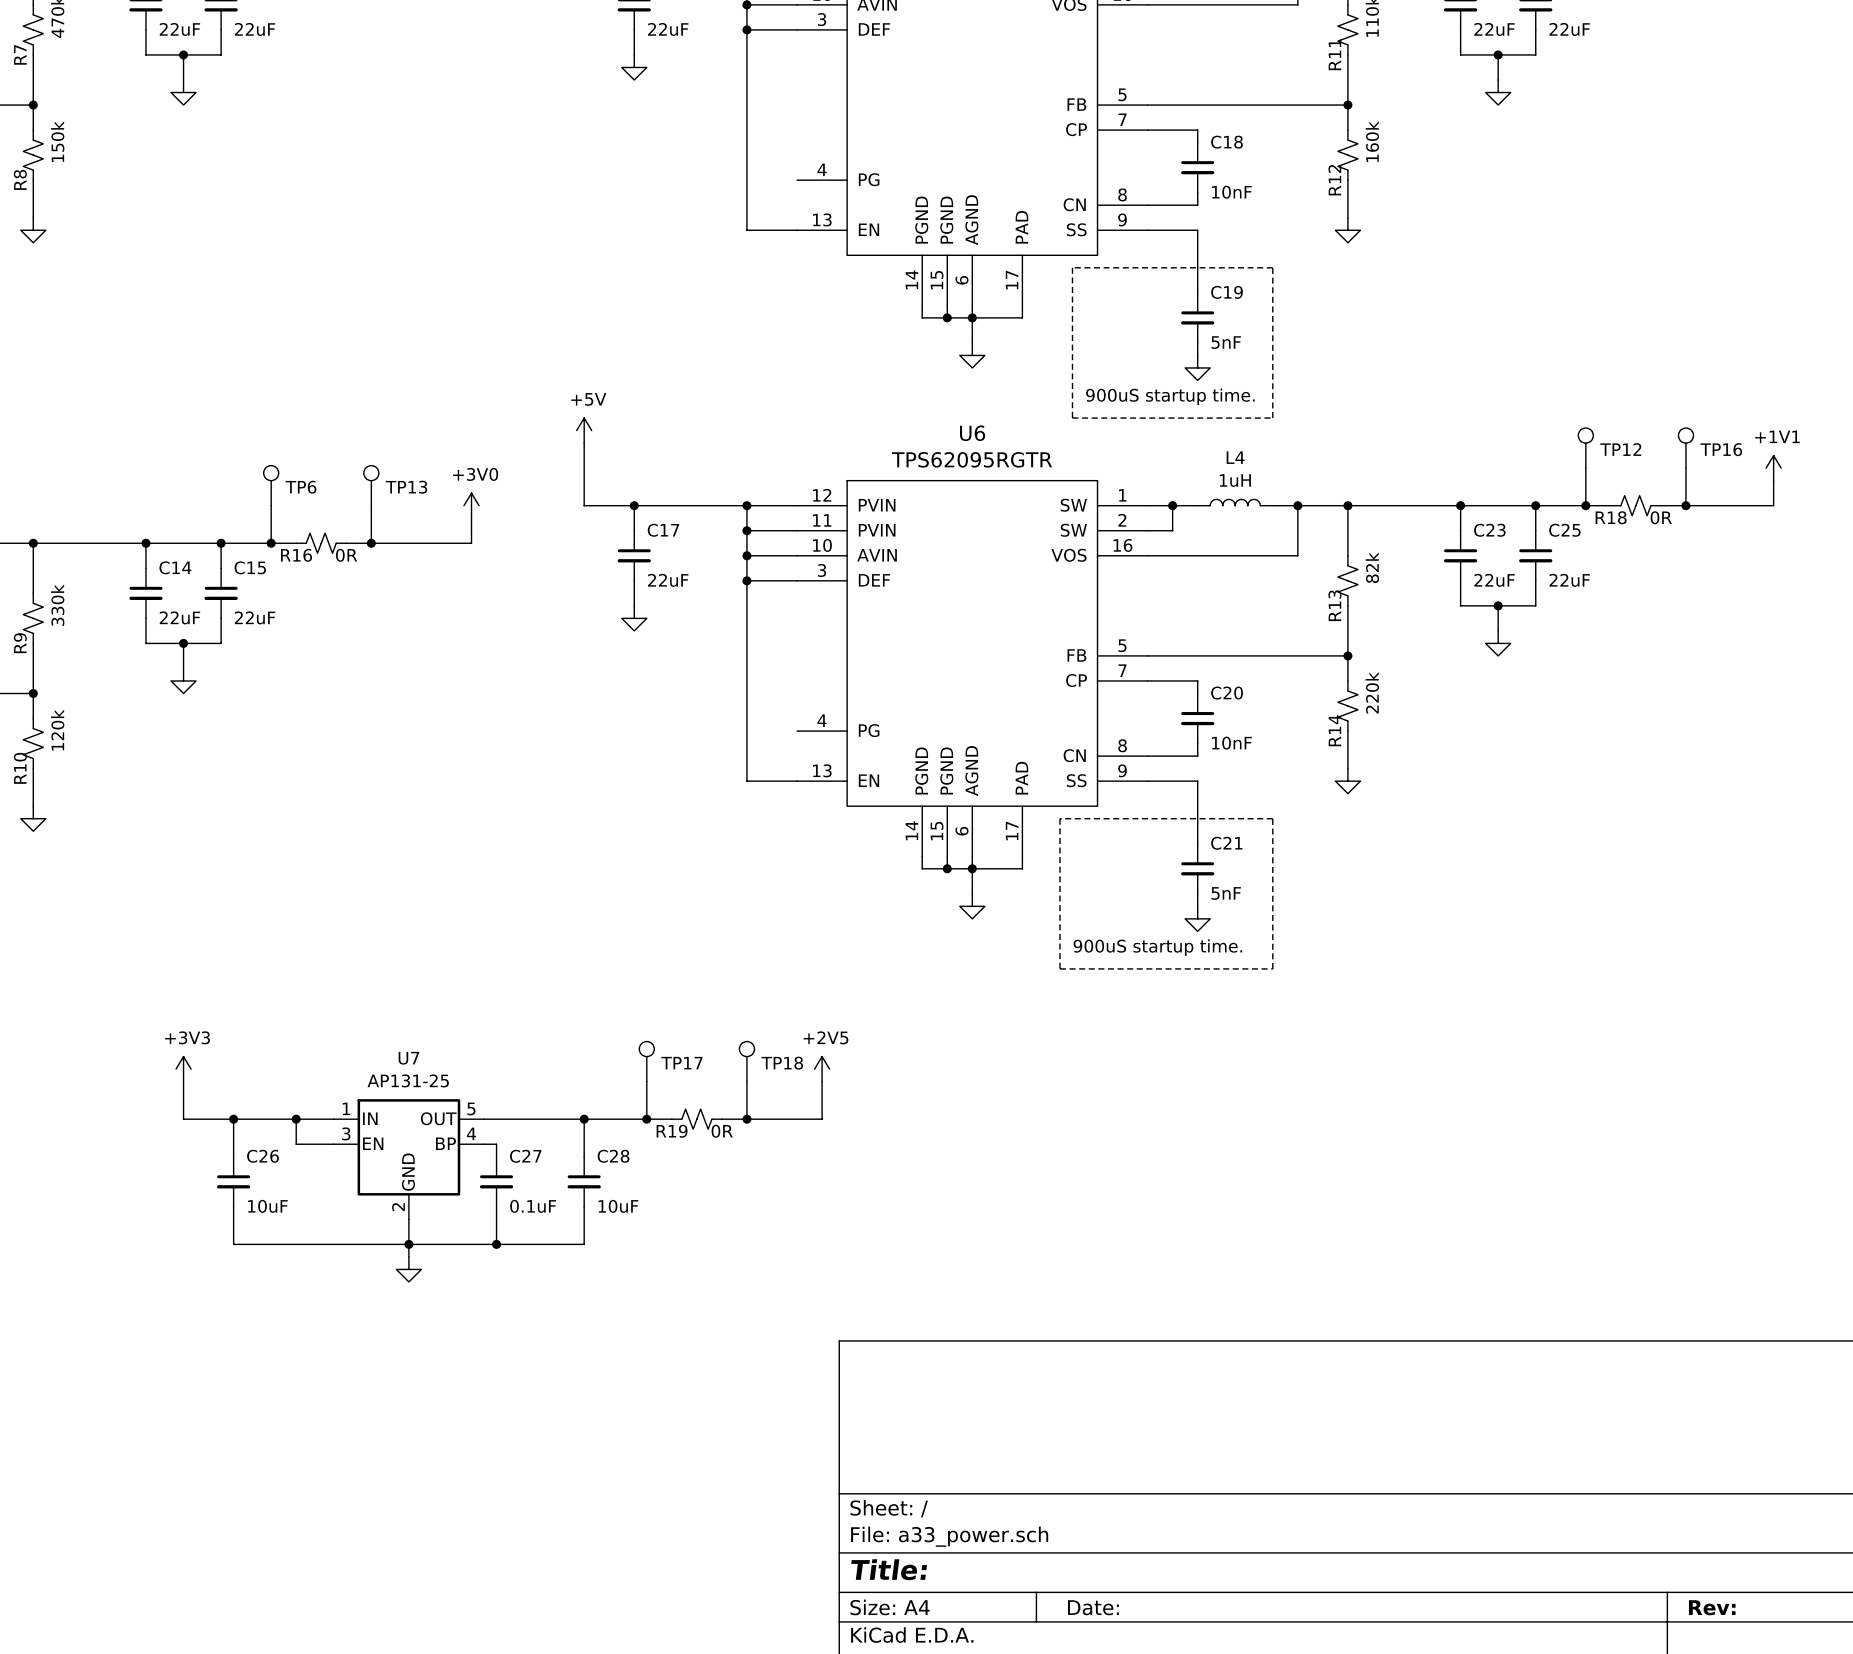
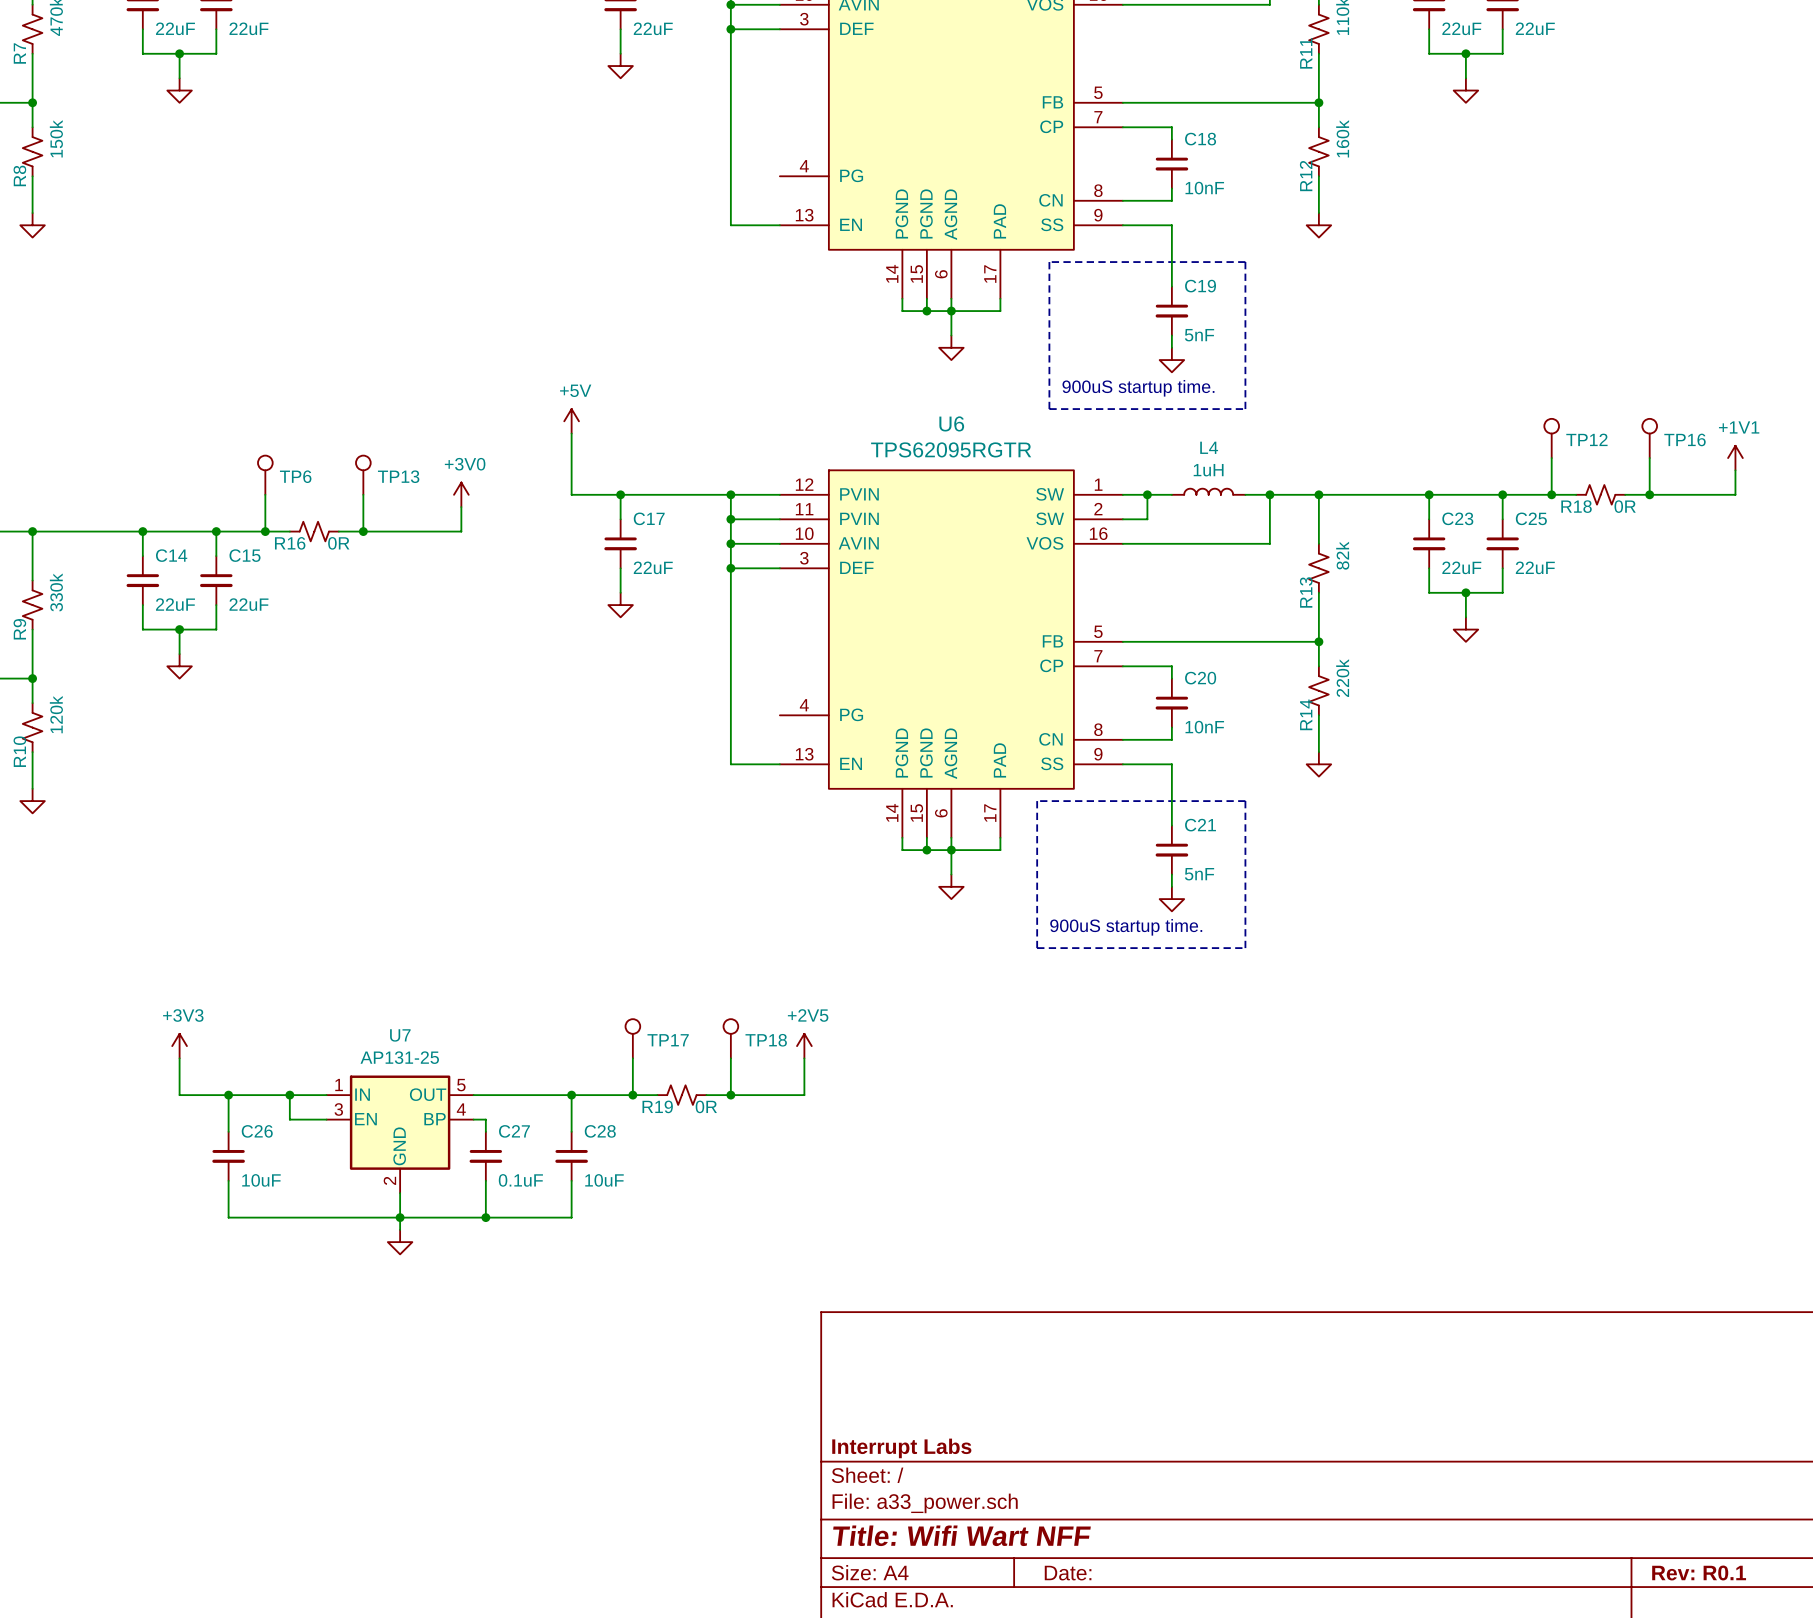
title block: none -> Interrupt Labs (901, 1448)
title block: Title: (889, 1569) -> Title: Wifi Wart NFF (961, 1535)
title block: Rev: (1712, 1607) -> Rev: R0.1 (1699, 1572)

